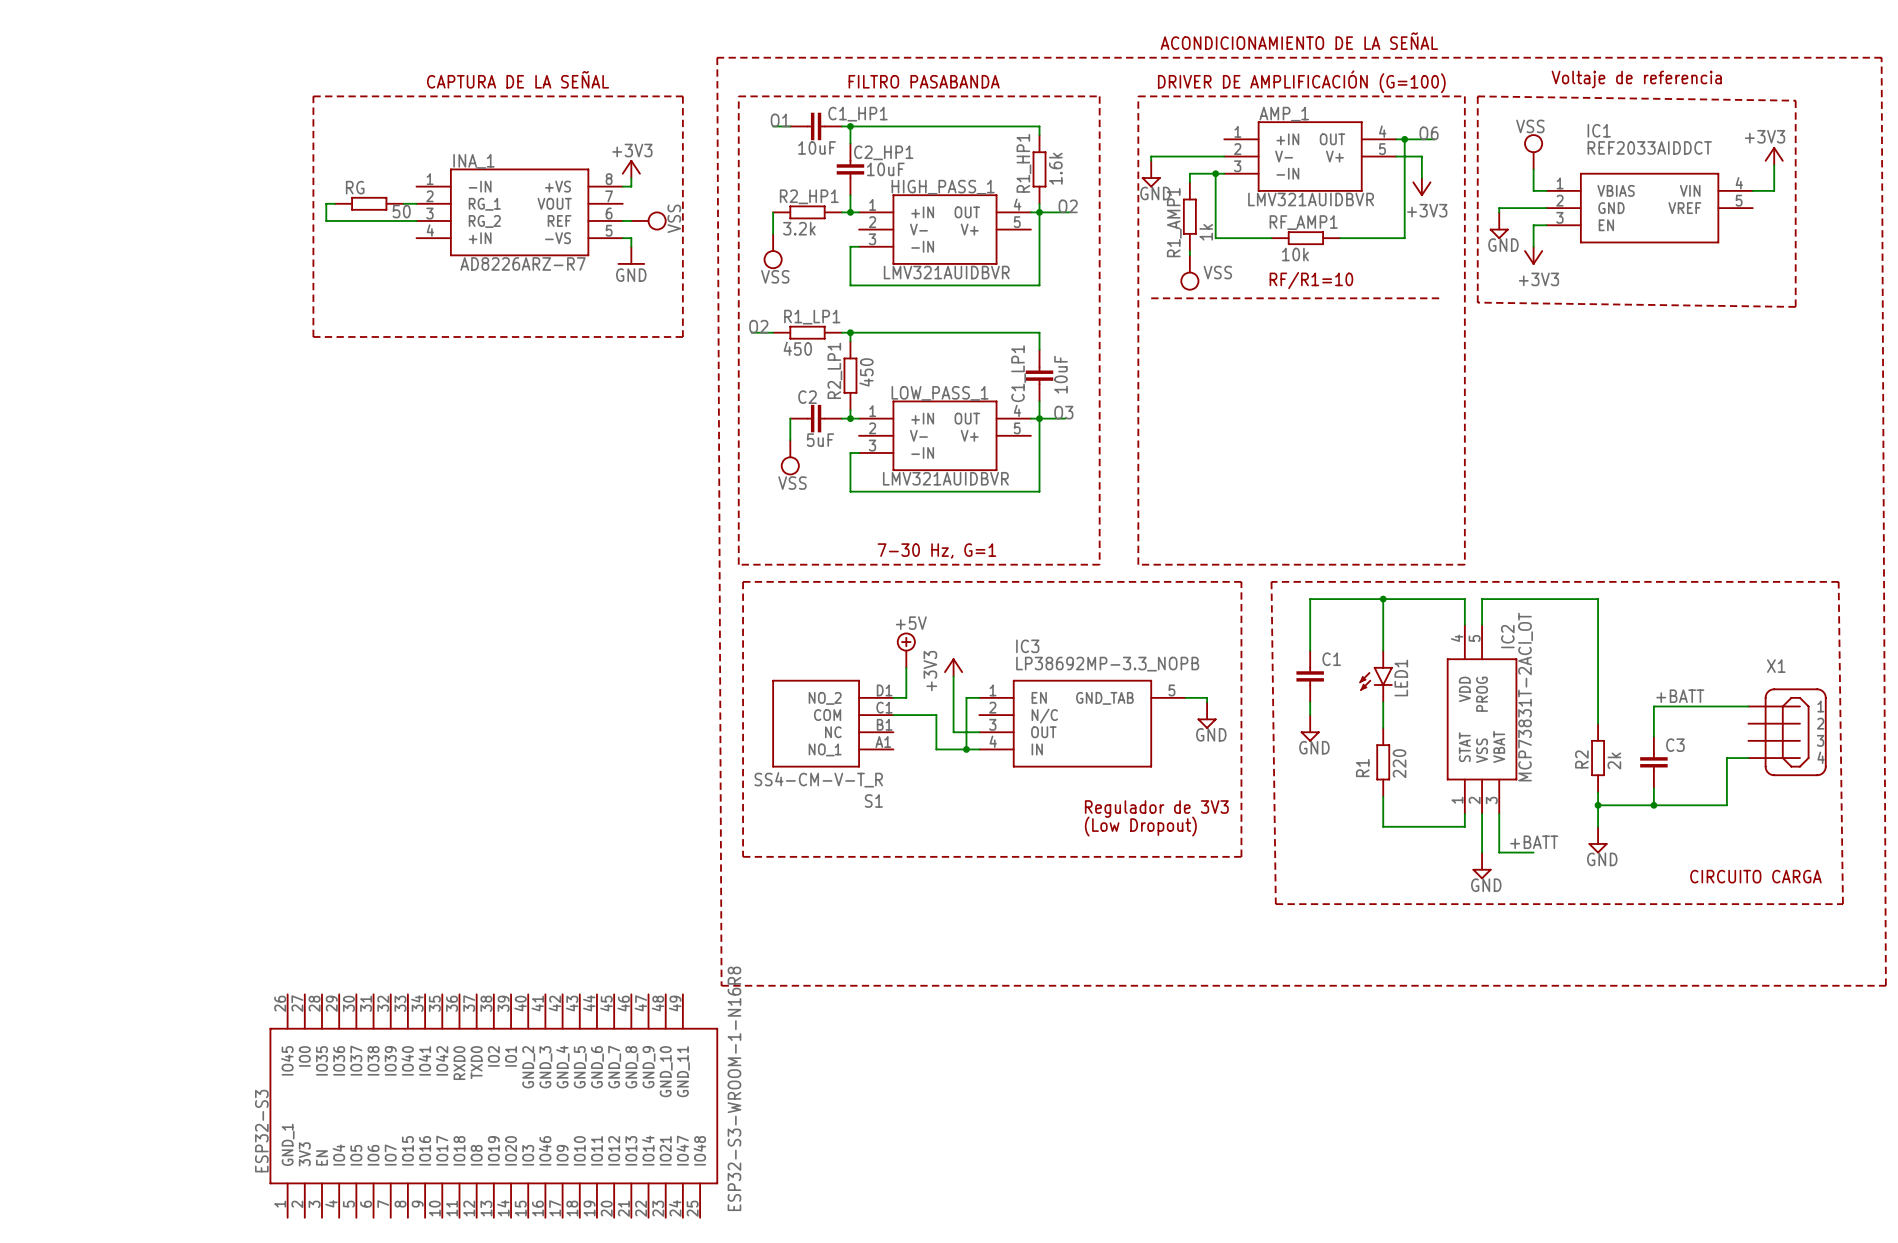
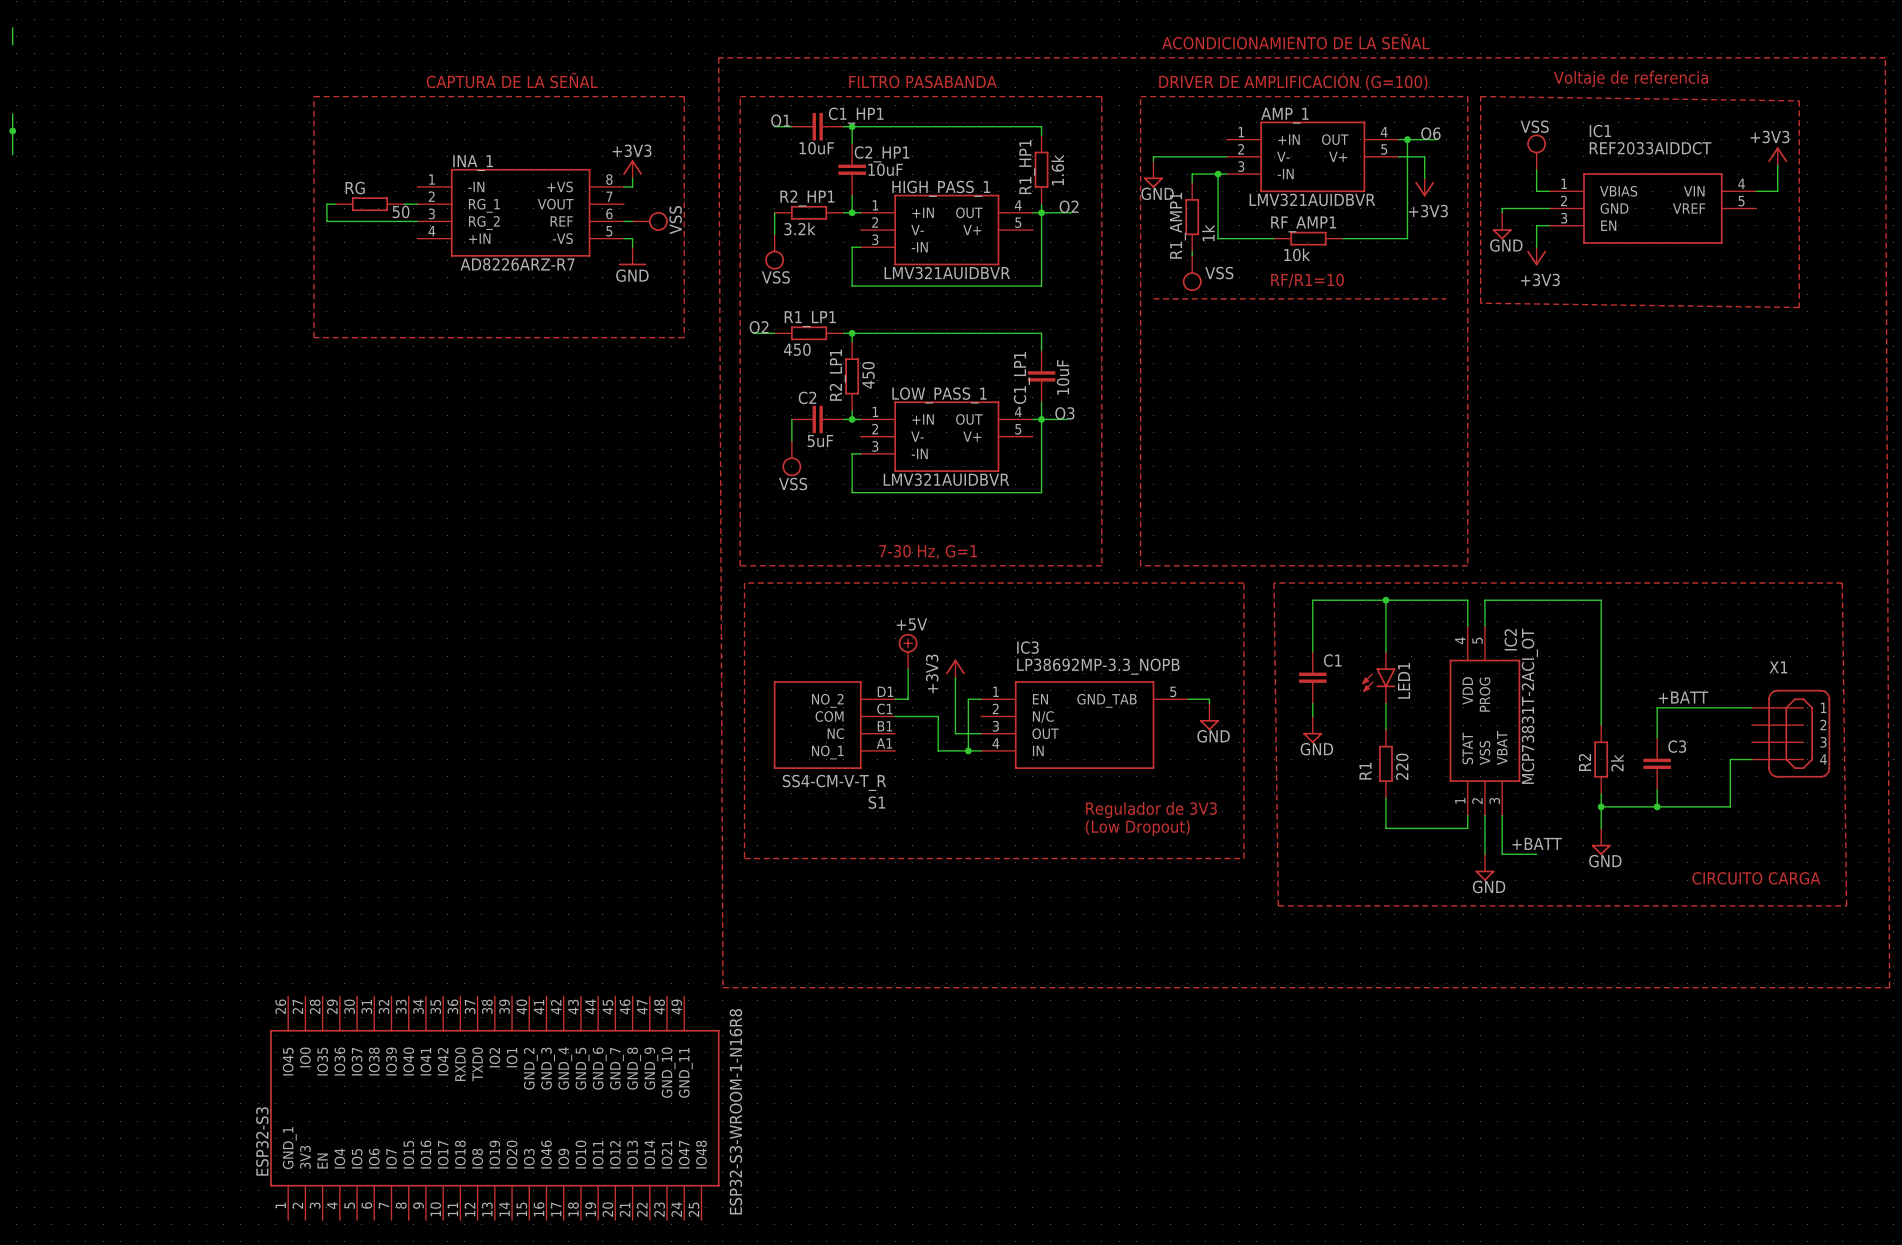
wire: none -> (12, 27) (12, 44)
wire: none -> (12, 113) (12, 154)
junction: none -> (12, 131)

